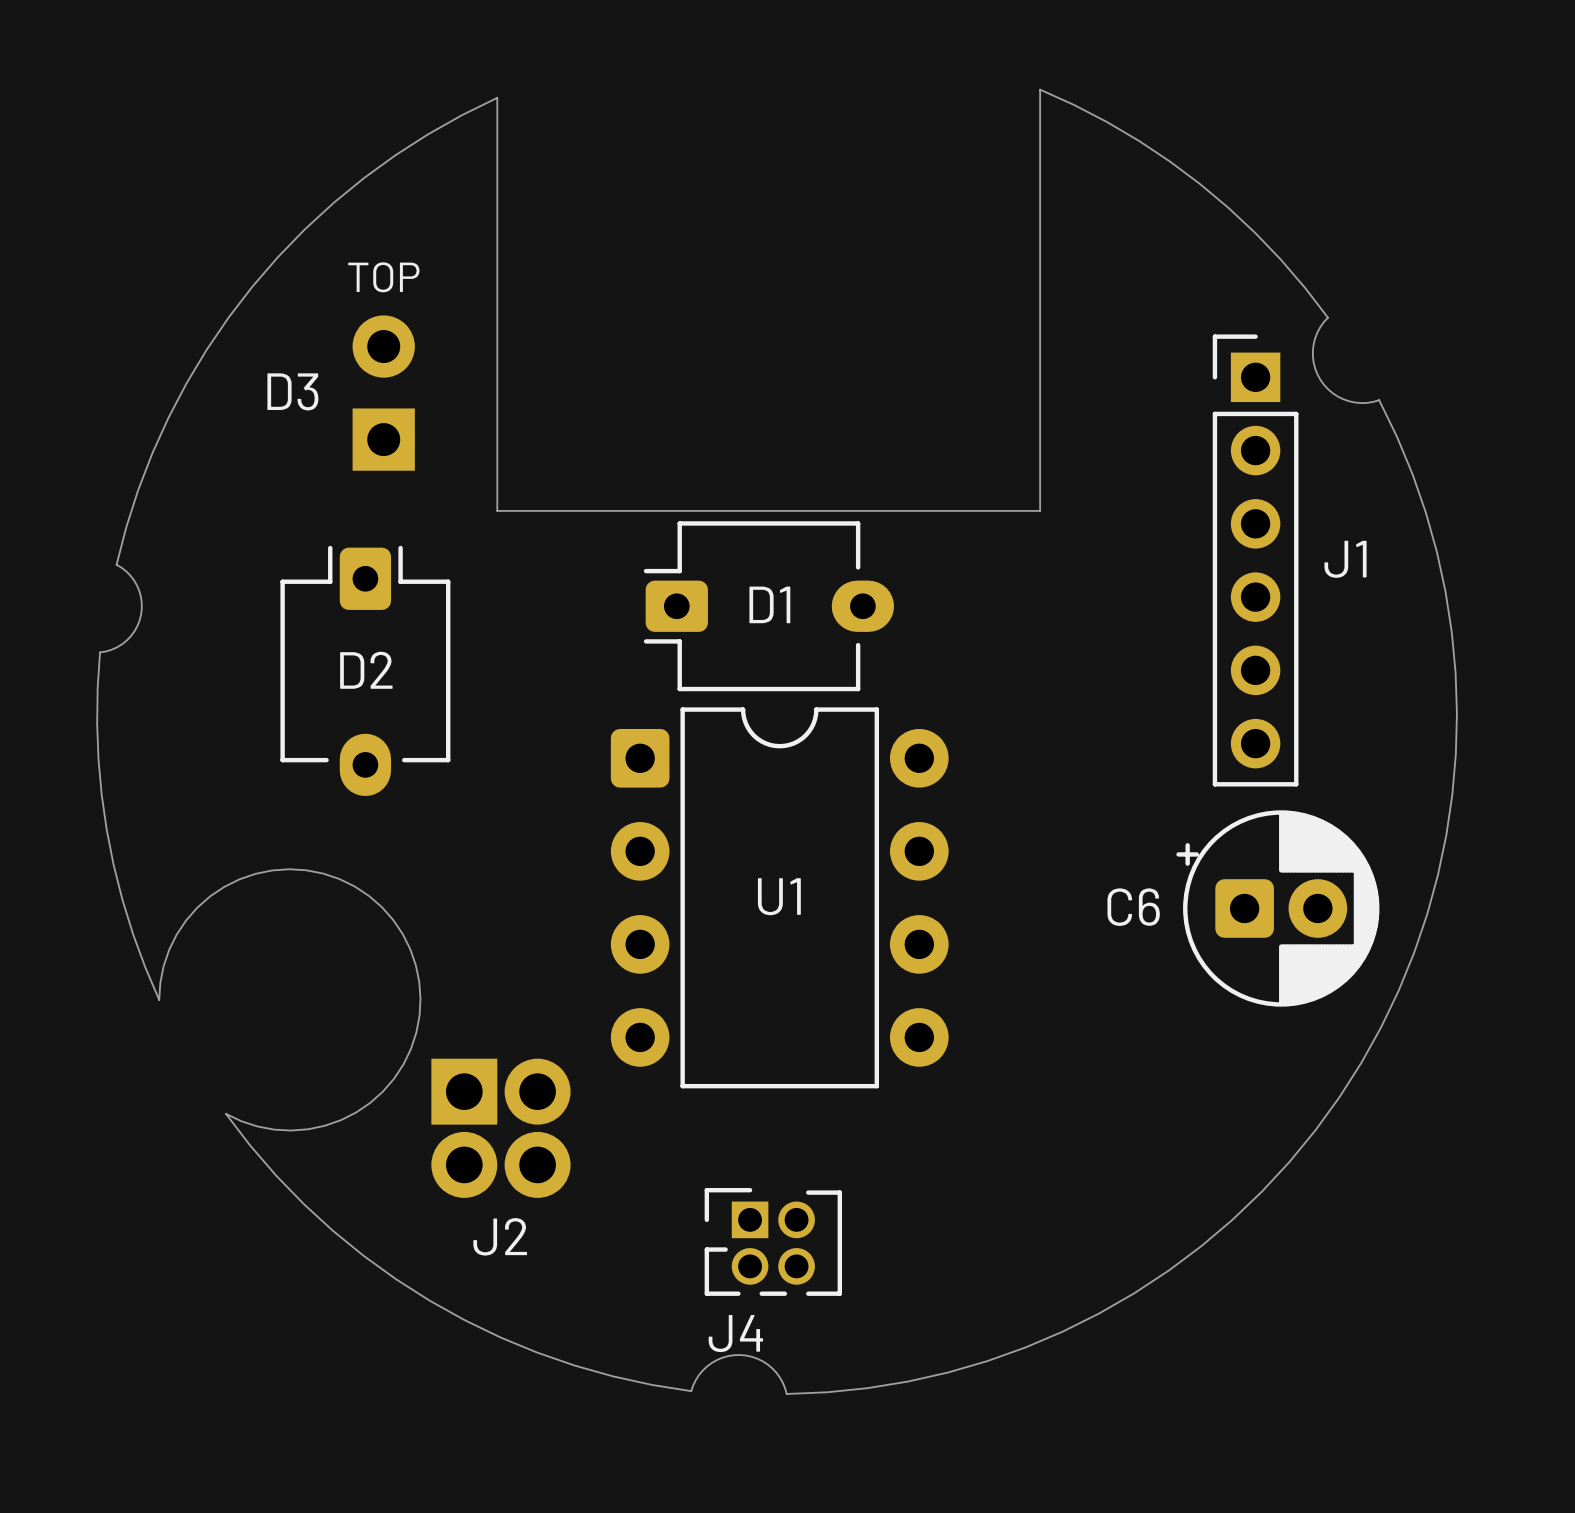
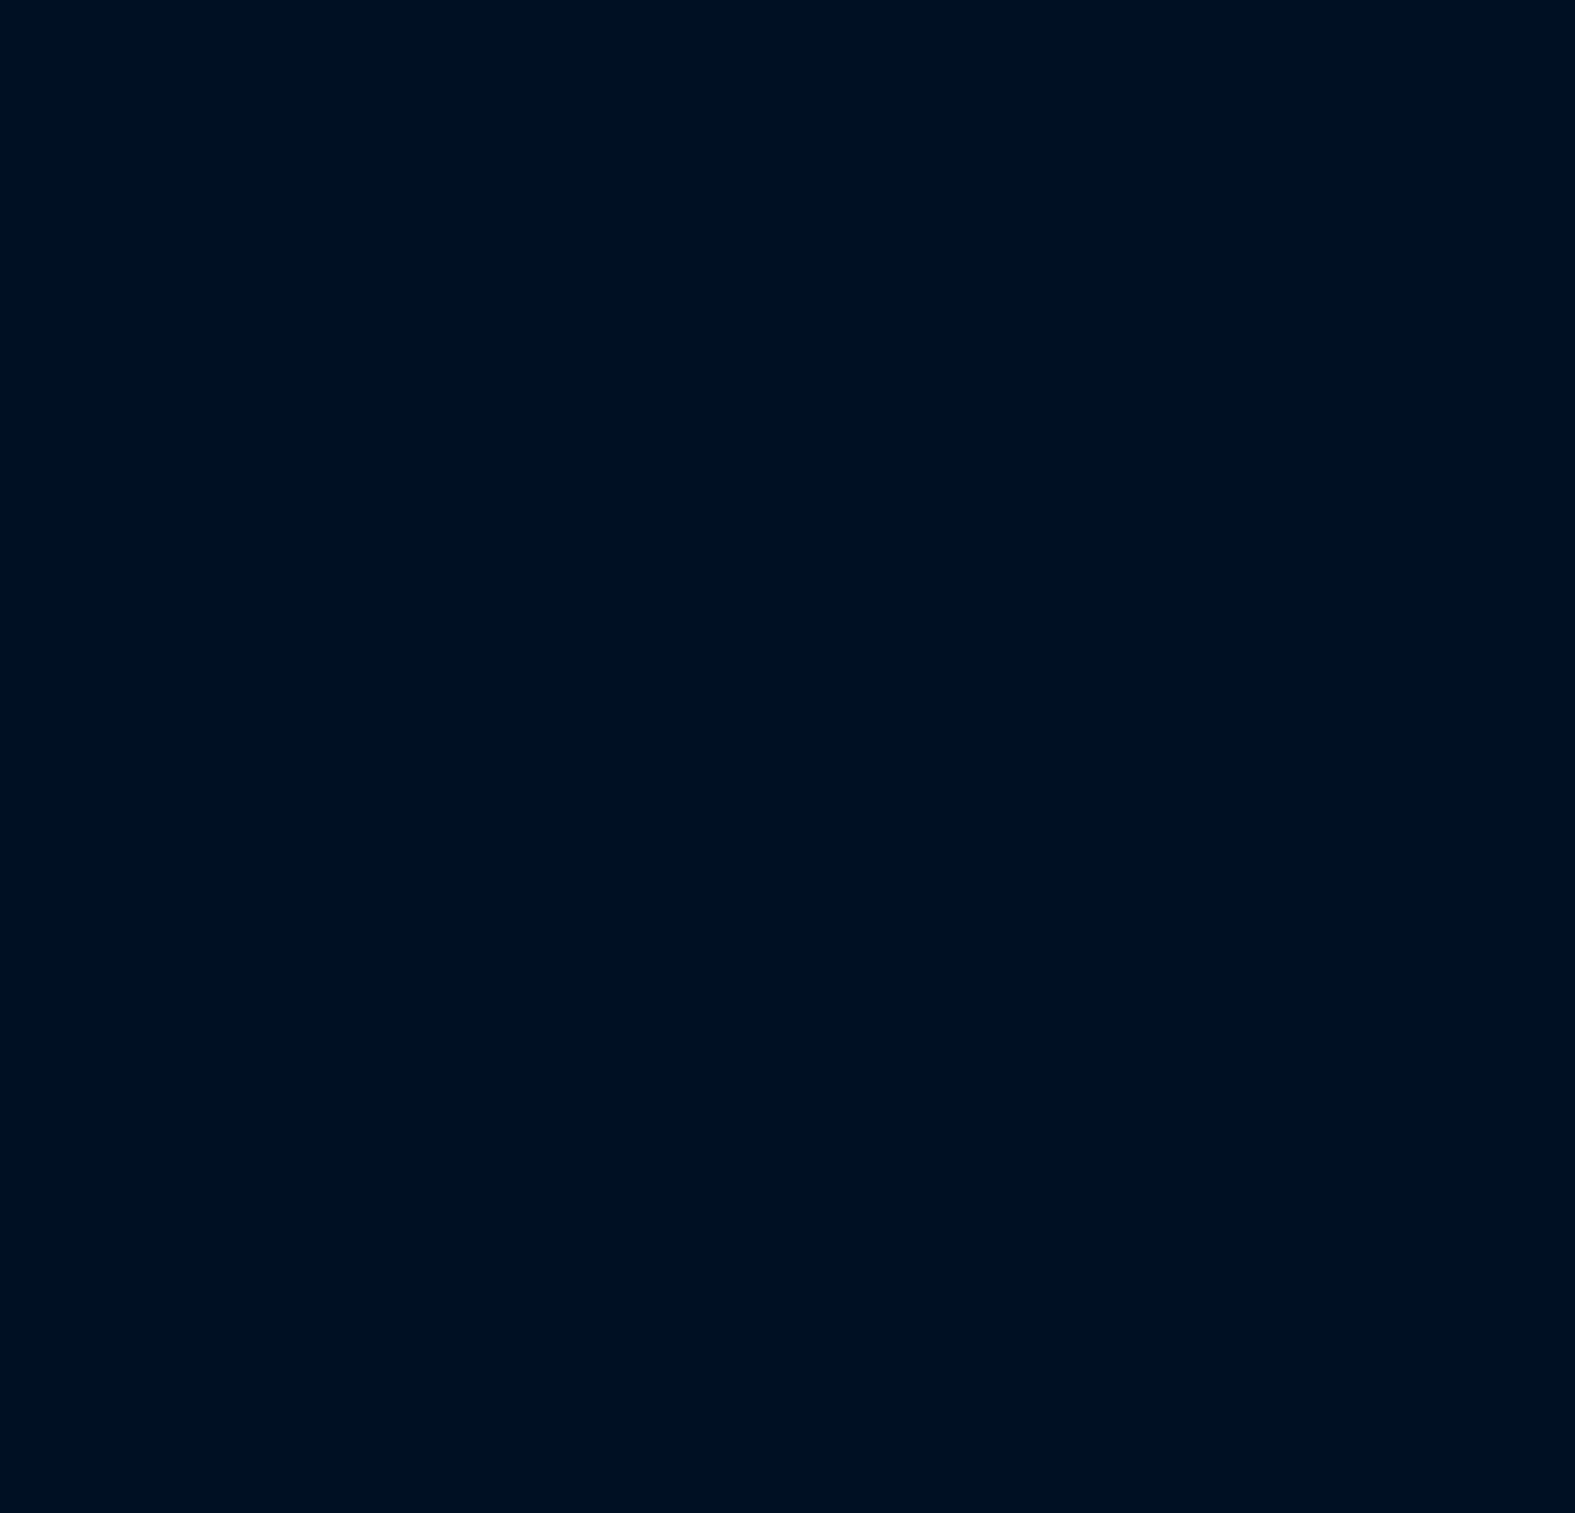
board edge: (1040, 89) (1040, 510) (497, 510) (497, 97) (462, 115) (395, 155) (333, 202) (304, 229) (252, 286) (228, 317) (186, 383) (152, 453) (138, 489) (116, 564) (130, 575) (137, 585) (141, 602) (141, 614) (137, 626) (126, 640) (117, 647) (100, 652) (97, 723) (101, 794) (106, 830) (122, 899) (145, 967) (159, 999) (163, 966) (169, 950) (186, 920) (210, 896) (239, 879) (255, 873) (289, 869) (323, 873) (354, 886) (381, 907) (402, 933) (415, 965) (419, 982) (419, 1016) (416, 1032) (403, 1064) (394, 1078) (383, 1091) (356, 1112) (341, 1120) (308, 1129) (274, 1129) (257, 1126) (225, 1113) (276, 1175) (303, 1204) (363, 1256) (429, 1300) (500, 1337) (537, 1352) (613, 1376) (691, 1391) (698, 1375) (711, 1362) (728, 1356) (746, 1355) (762, 1361) (772, 1368) (782, 1382) (786, 1394) (868, 1388) (908, 1381) (987, 1361) (1025, 1347) (1099, 1313) (1134, 1292) (1168, 1270) (1232, 1219) (1289, 1161) (1339, 1097) (1361, 1062) (1398, 990) (1414, 952) (1437, 875) (1452, 794) (1456, 713) (1451, 632) (1445, 592) (1425, 512) (1412, 474) (1379, 400) (1361, 403) (1343, 399) (1327, 389) (1320, 379) (1313, 362) (1313, 344) (1320, 327) (1327, 317) (1305, 288) (1255, 233) (1199, 183) (1139, 140) (1074, 104) (1040, 89) -> none
text: TOP (383, 277) -> none
D3: (383, 393) -> none
J1: (1255, 560) -> none
D1: (768, 606) -> none
D2: (365, 670) -> none
U1: (779, 897) -> none
C6: (1277, 908) -> none
J2: (500, 1128) -> none
J4: (773, 1241) -> none

